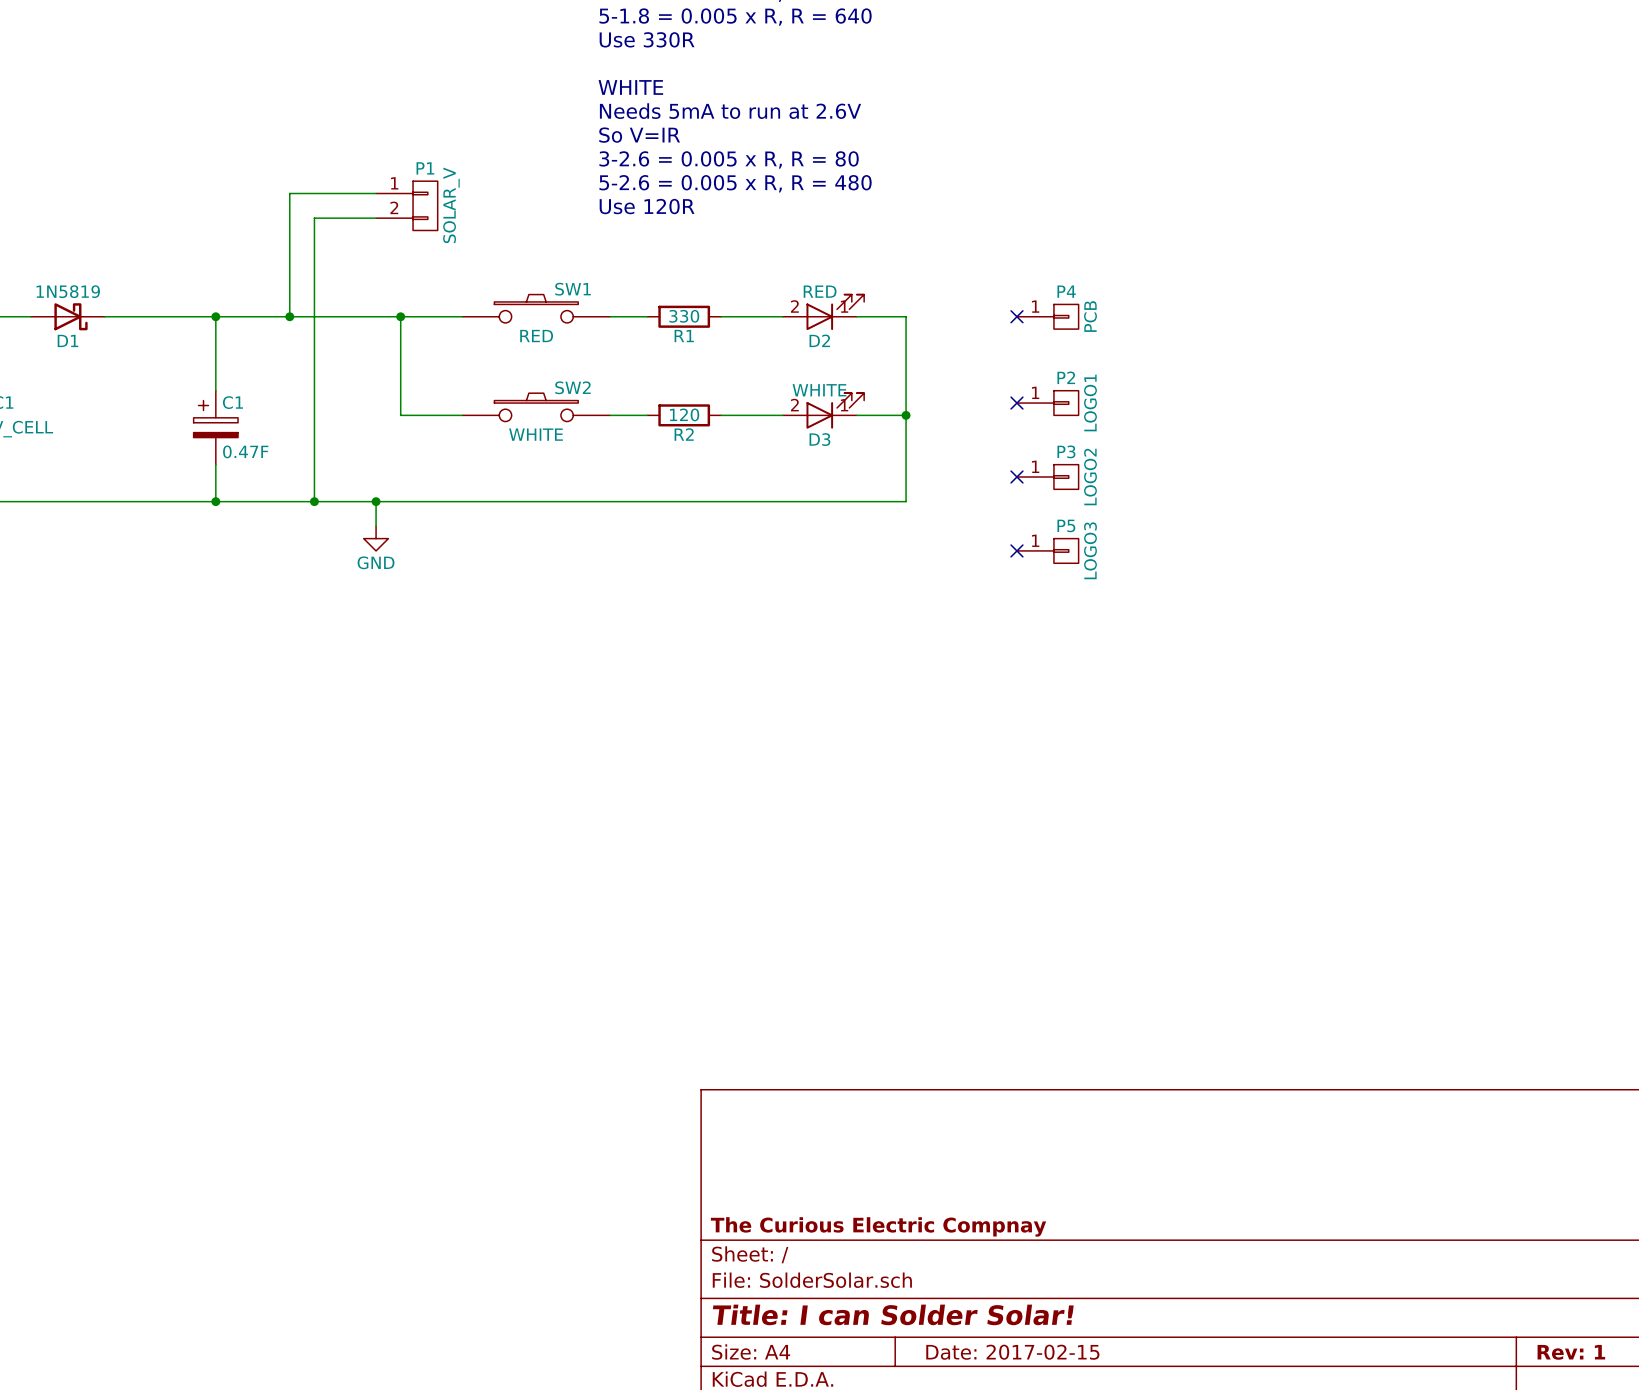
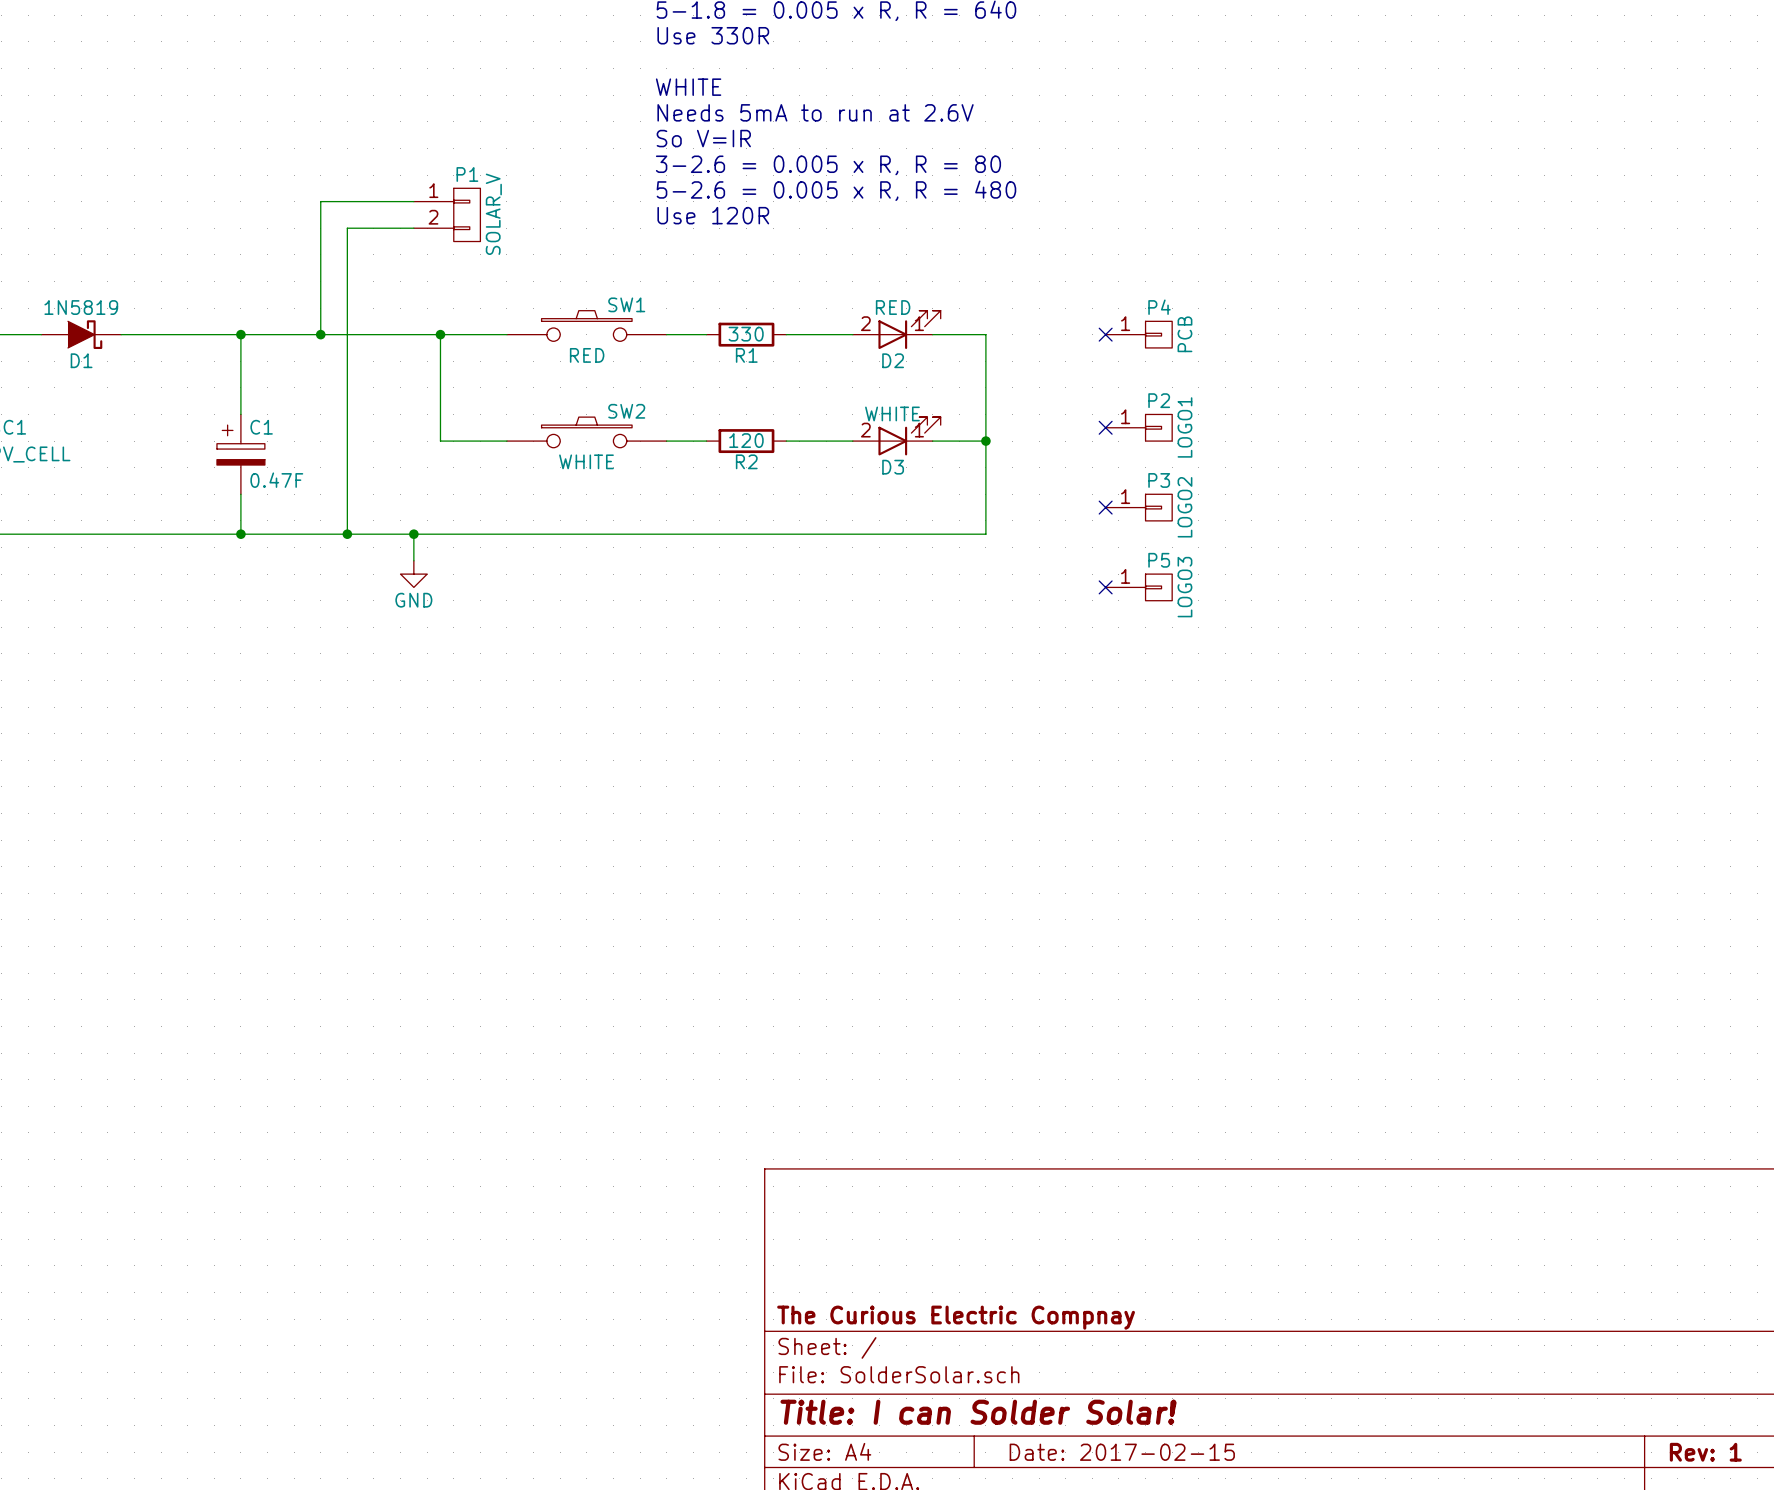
D1 symbol: [30, 303, 105, 331] -> [41, 320, 122, 350]

